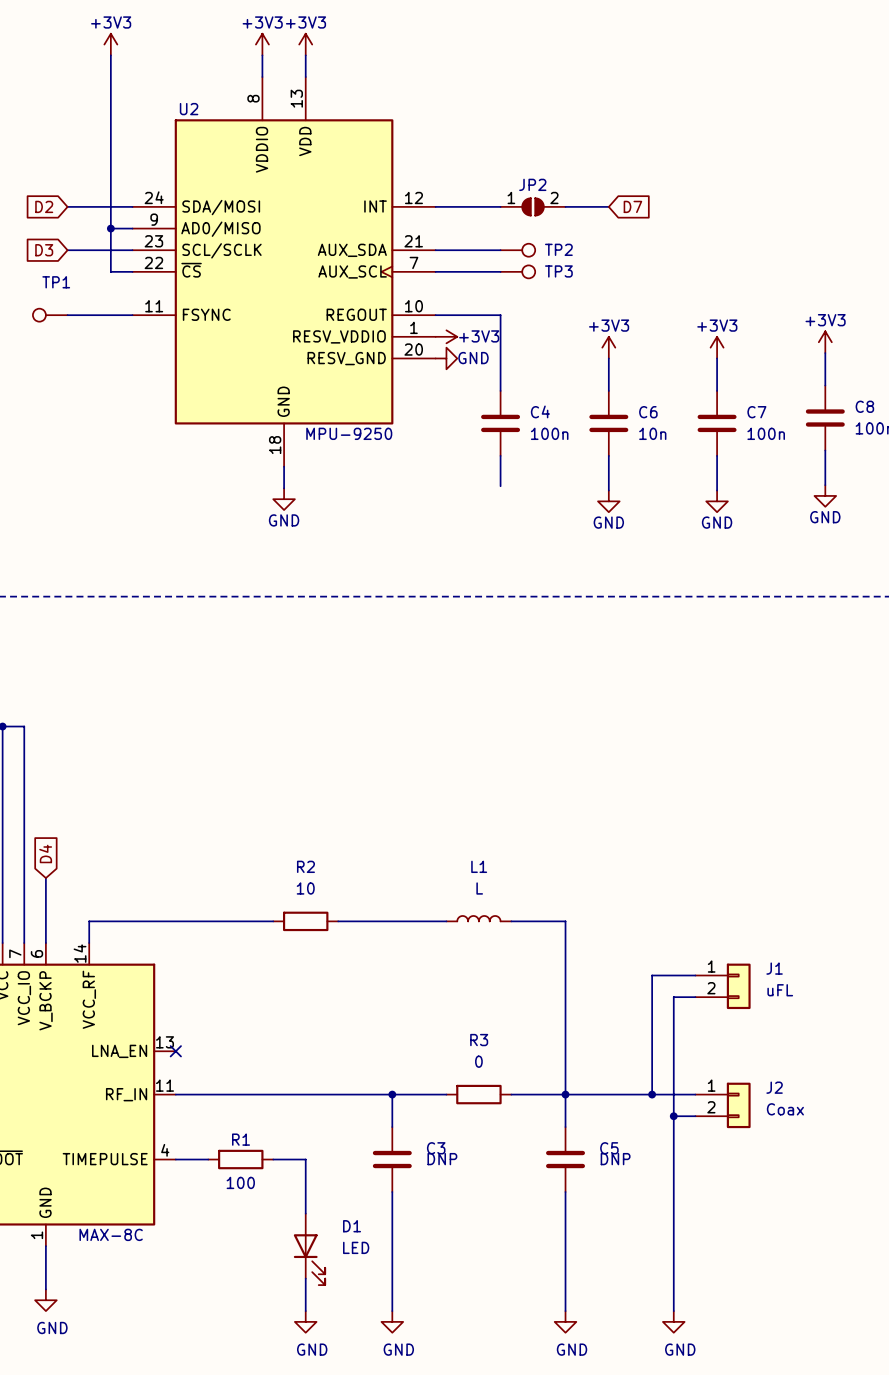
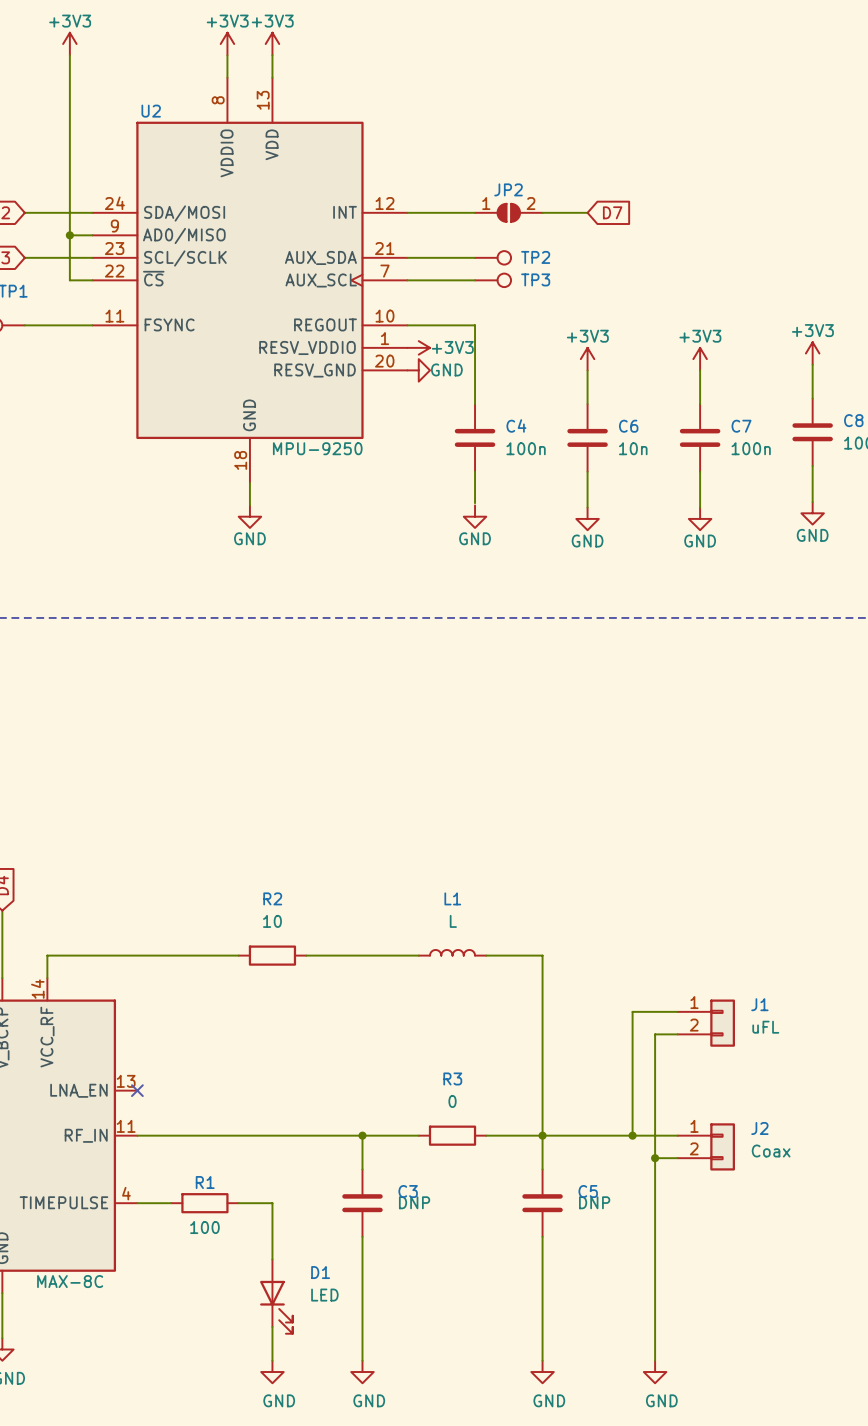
power symbol: none -> GND (475, 516)

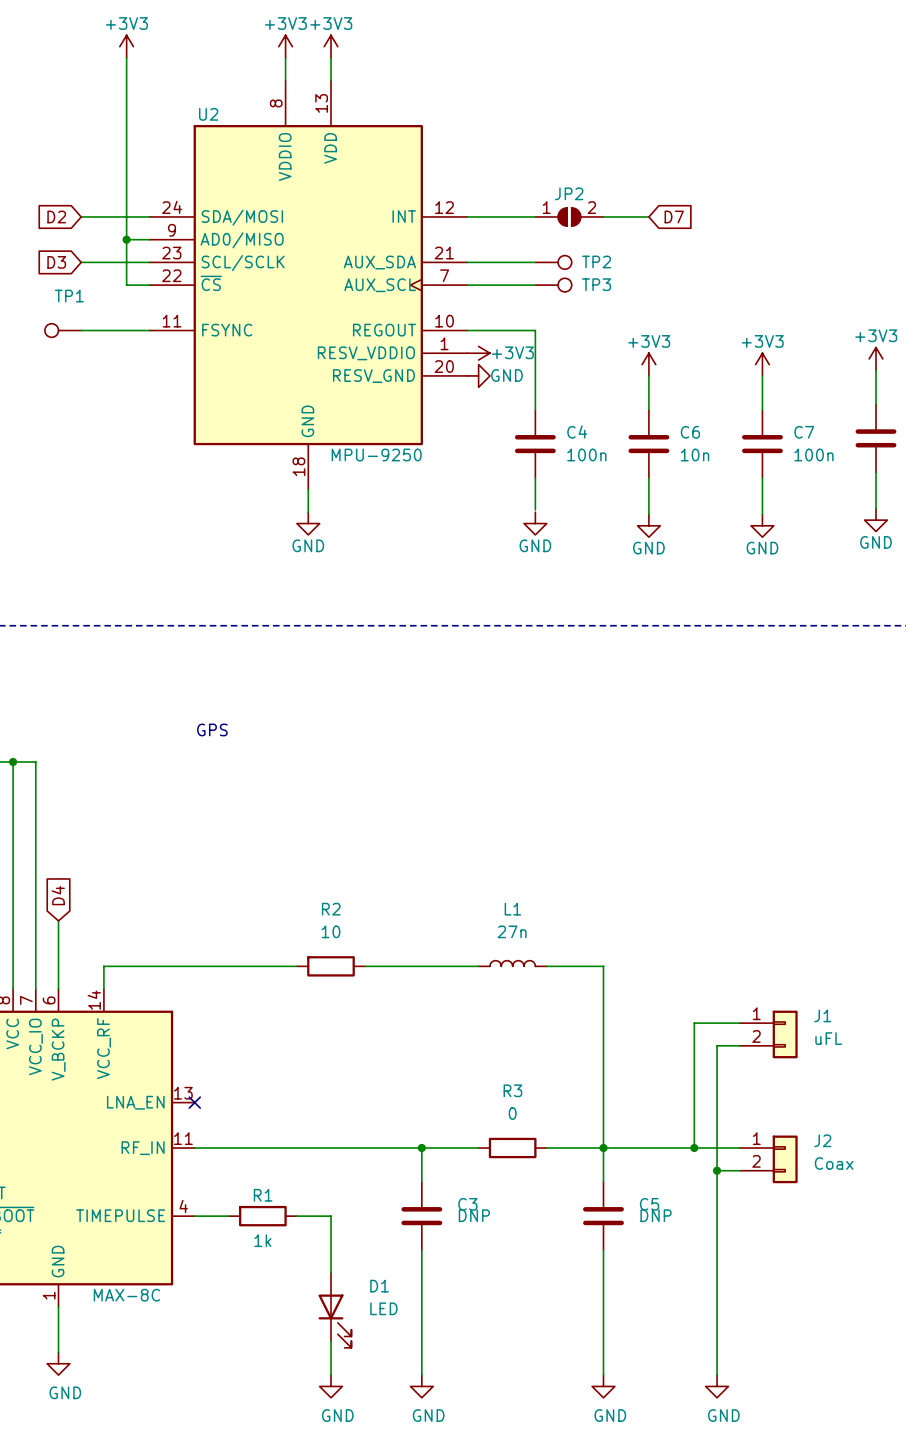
text: none -> GPS (212, 729)
L1 value: L (453, 921) -> 27n (512, 931)
R1 value: 100 (204, 1227) -> 1k (262, 1240)

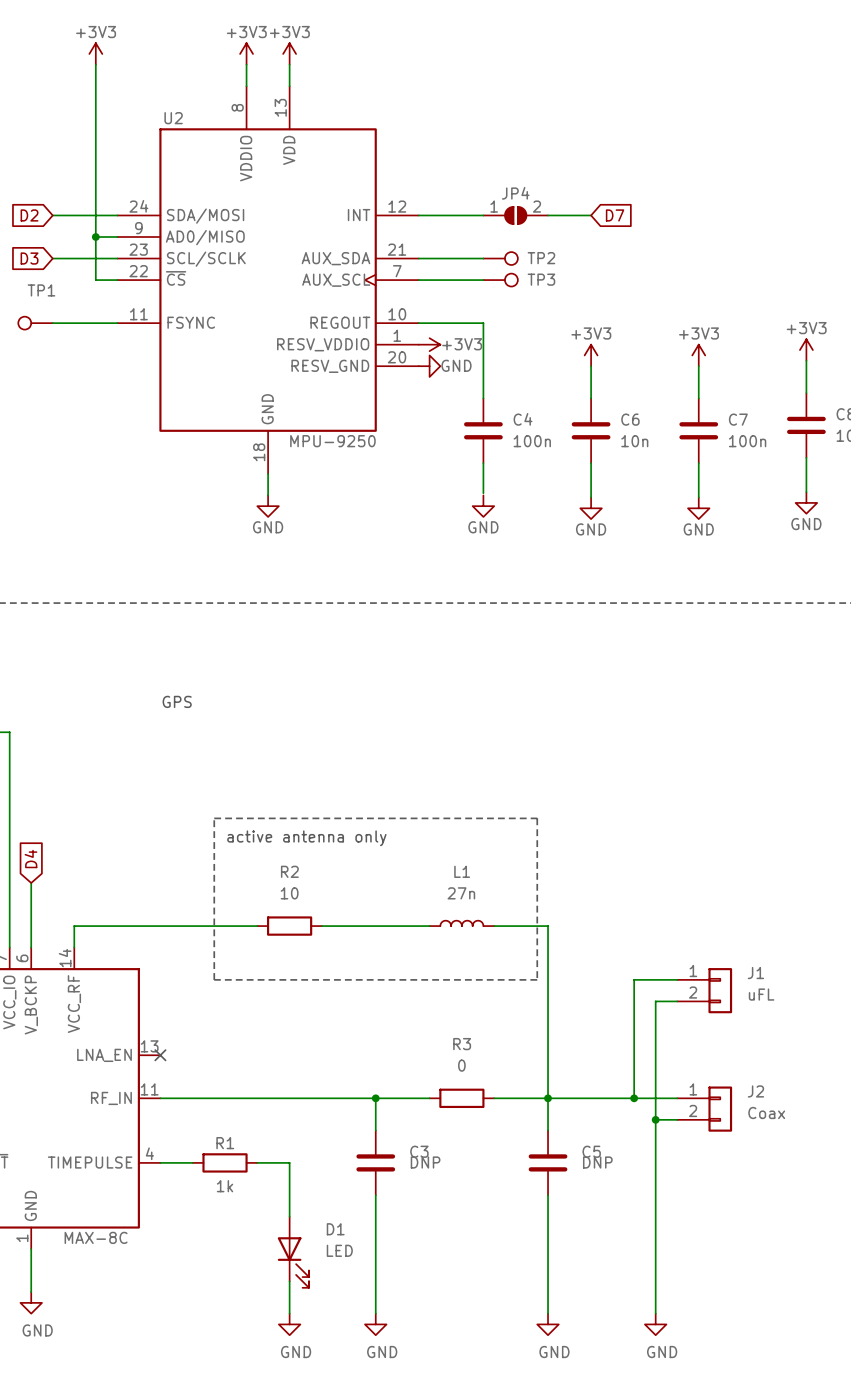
JP2 name: JP2 (569, 193) -> JP4 (515, 193)
line: none -> (214, 818) (214, 979) (537, 979) (537, 818) (214, 818)
text: none -> active antenna only (306, 838)

